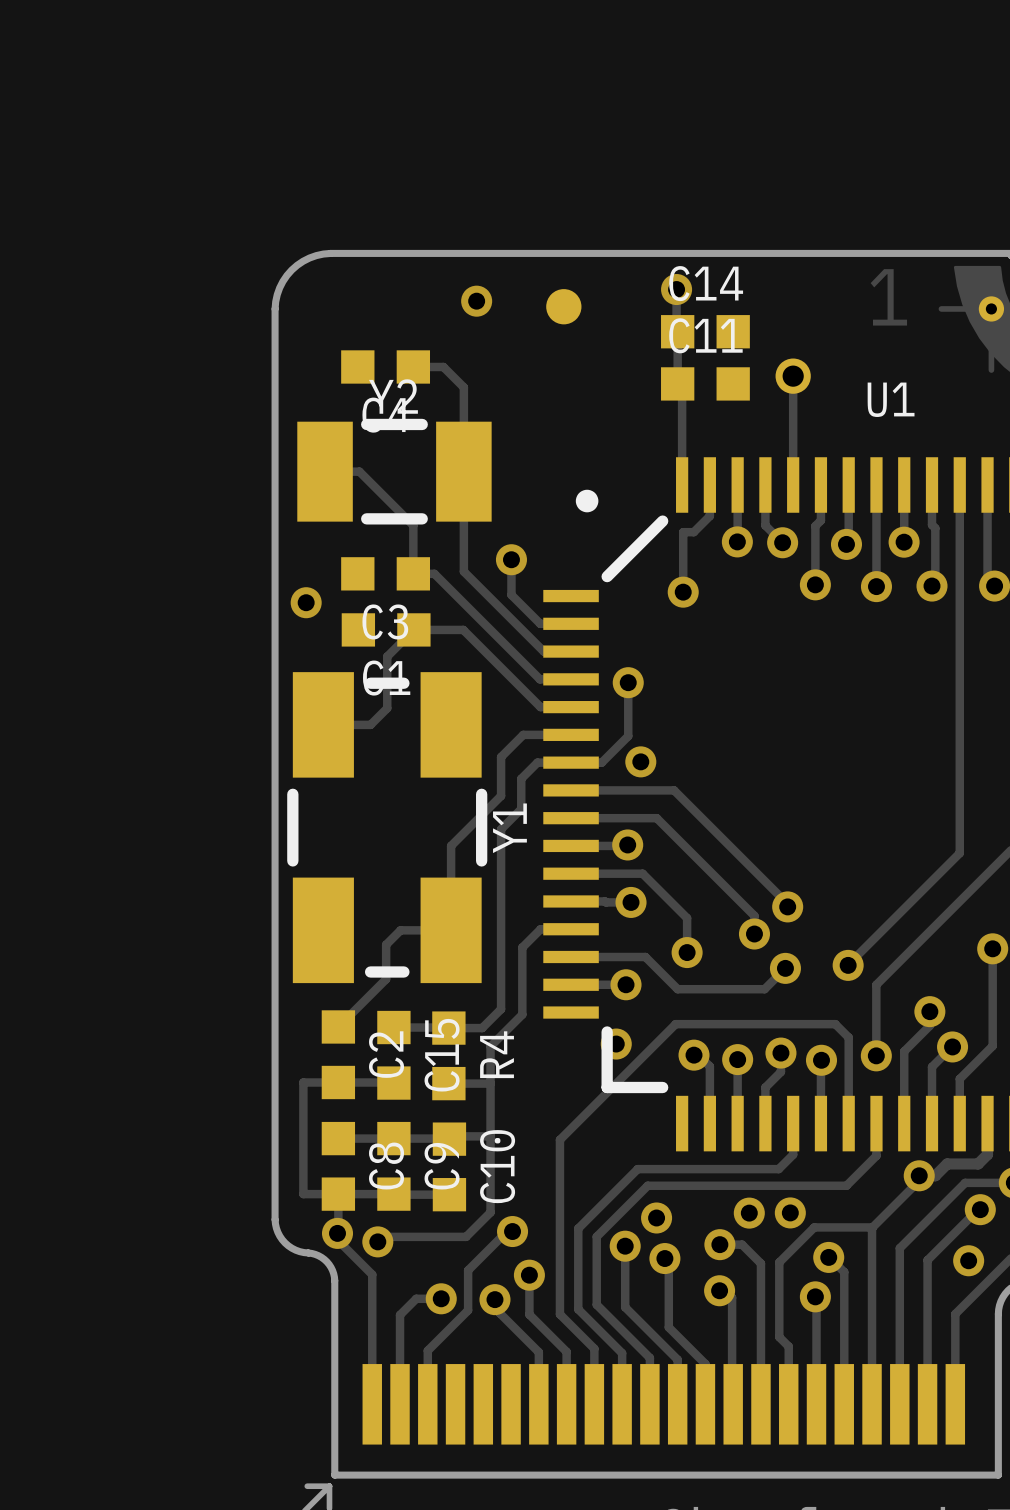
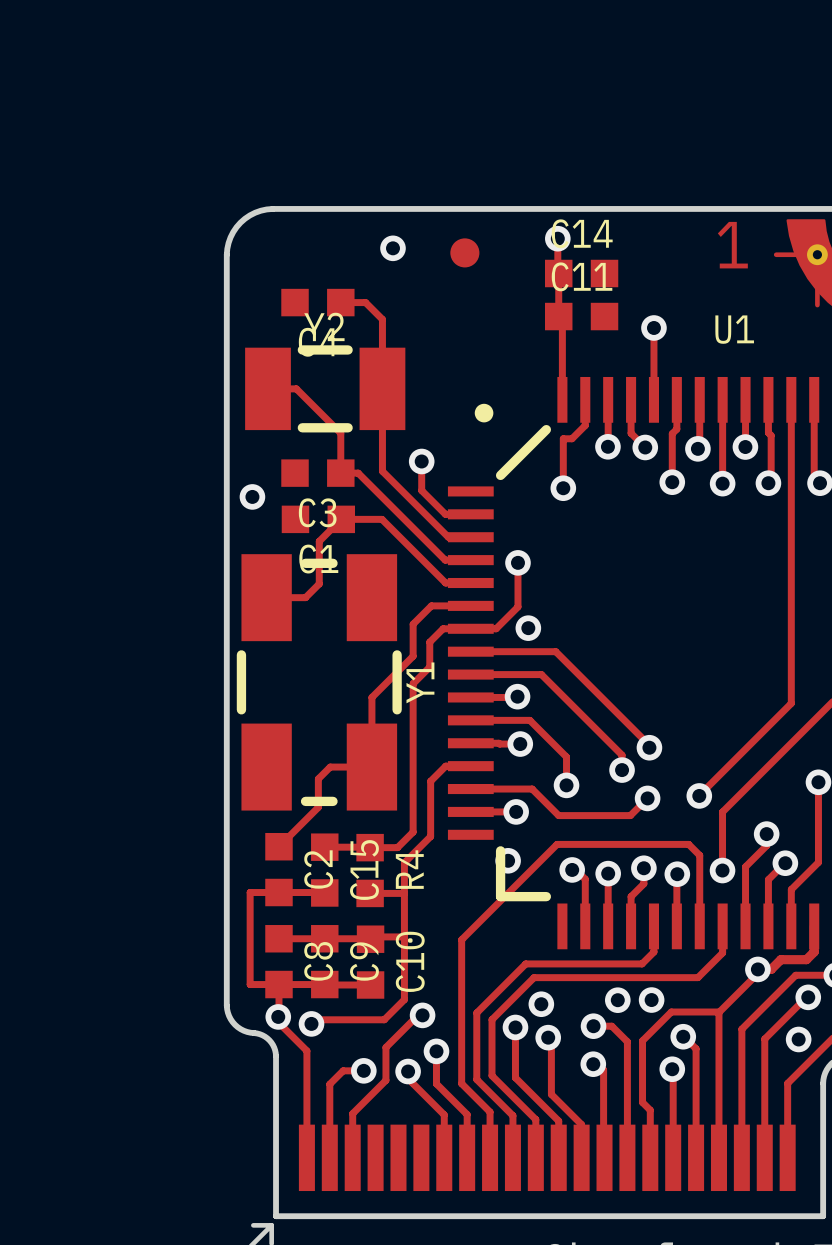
part: (793, 376) -> none
via: none -> (653, 327)

